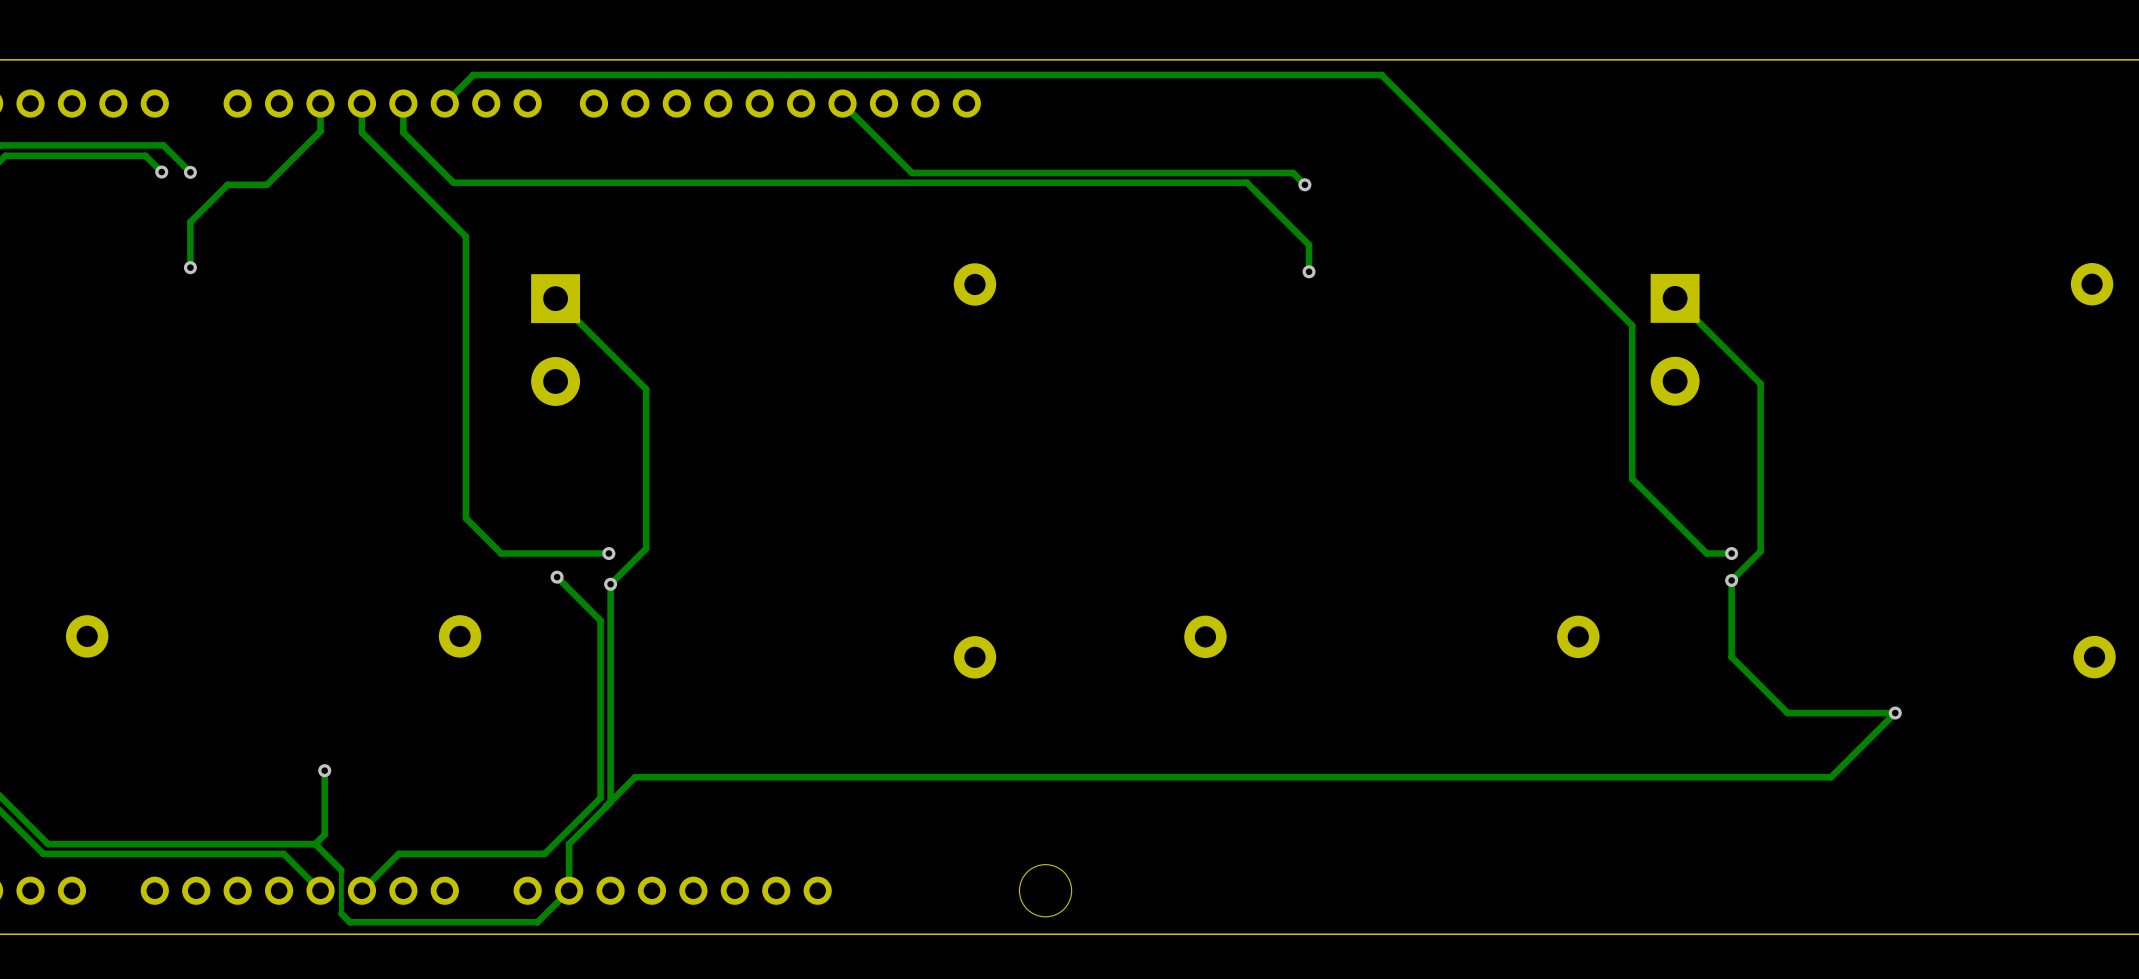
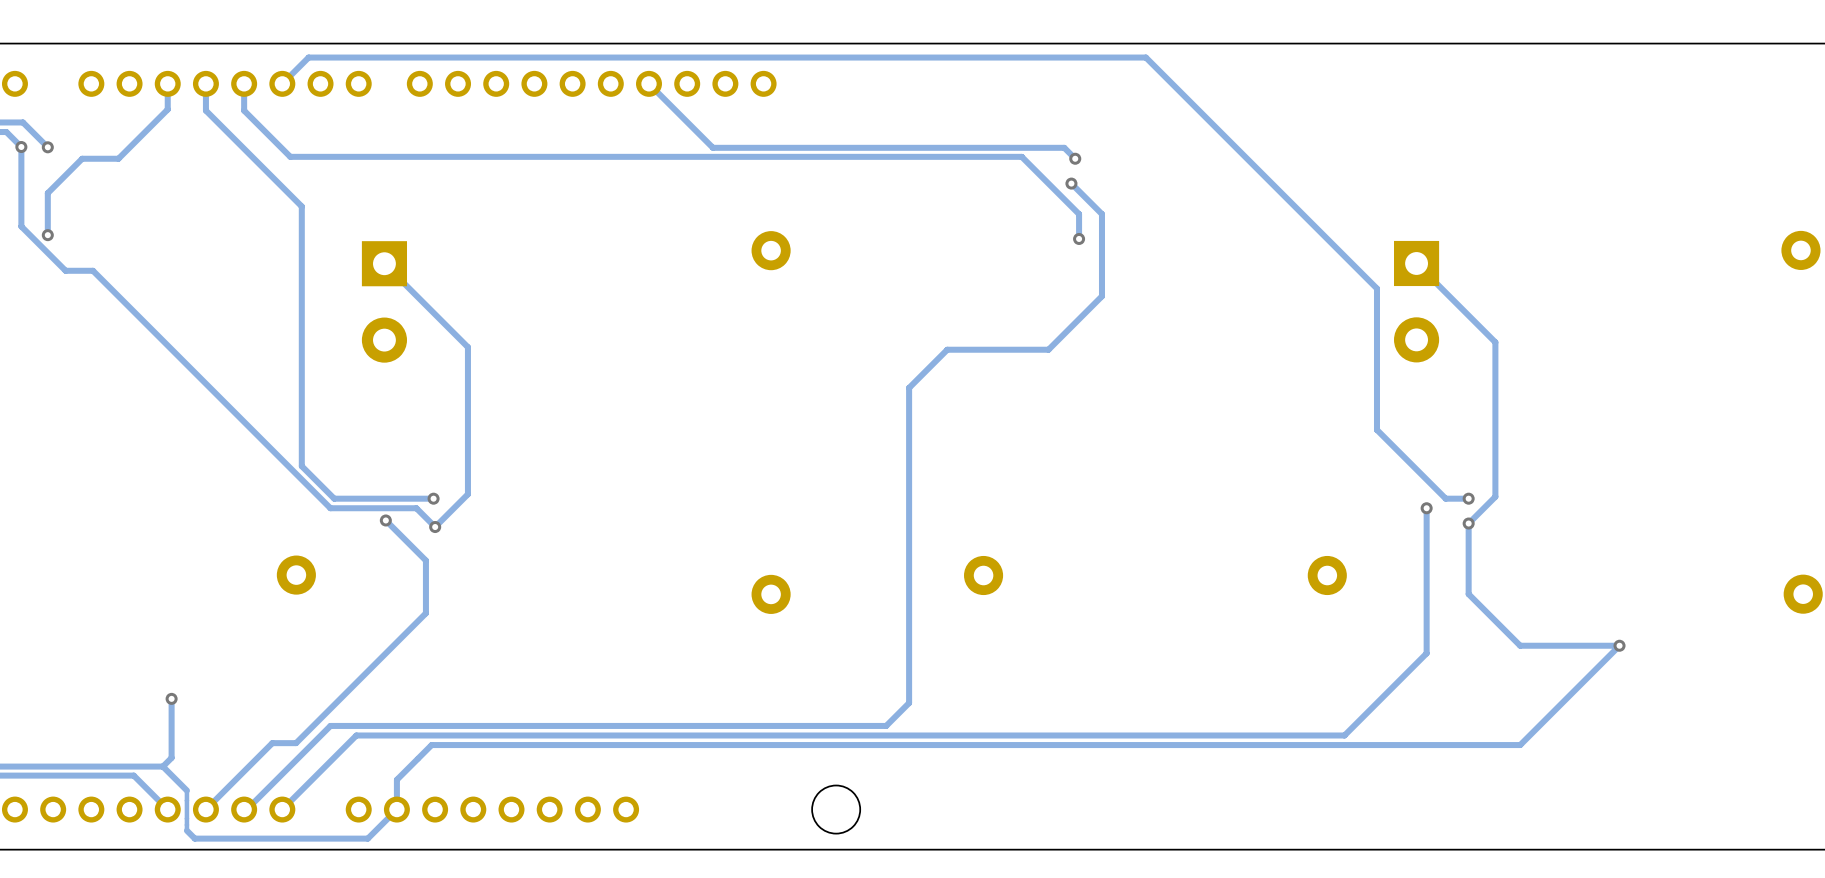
track: none -> (21, 147) (21, 226) (65, 270) (93, 270) (330, 508) (416, 508) (435, 527)
track: none -> (1071, 183) (1101, 214) (1101, 296) (1048, 349) (947, 349) (909, 387) (909, 703) (886, 725) (330, 725) (246, 809) (244, 809)
via: none -> (1071, 183)
track: none -> (1426, 508) (1426, 653) (1344, 735) (356, 735) (282, 809)
via: none -> (1426, 508)
track: (610, 584) (610, 802) (569, 843) (569, 858) -> (417, 759) (396, 779)
track: (600, 677) (600, 797) (544, 853) (398, 853) -> (425, 613) (296, 743) (272, 743) (239, 775)
track: (1831, 777) (635, 777) (605, 807) -> (1560, 704) (1520, 745) (431, 745) (418, 758)

